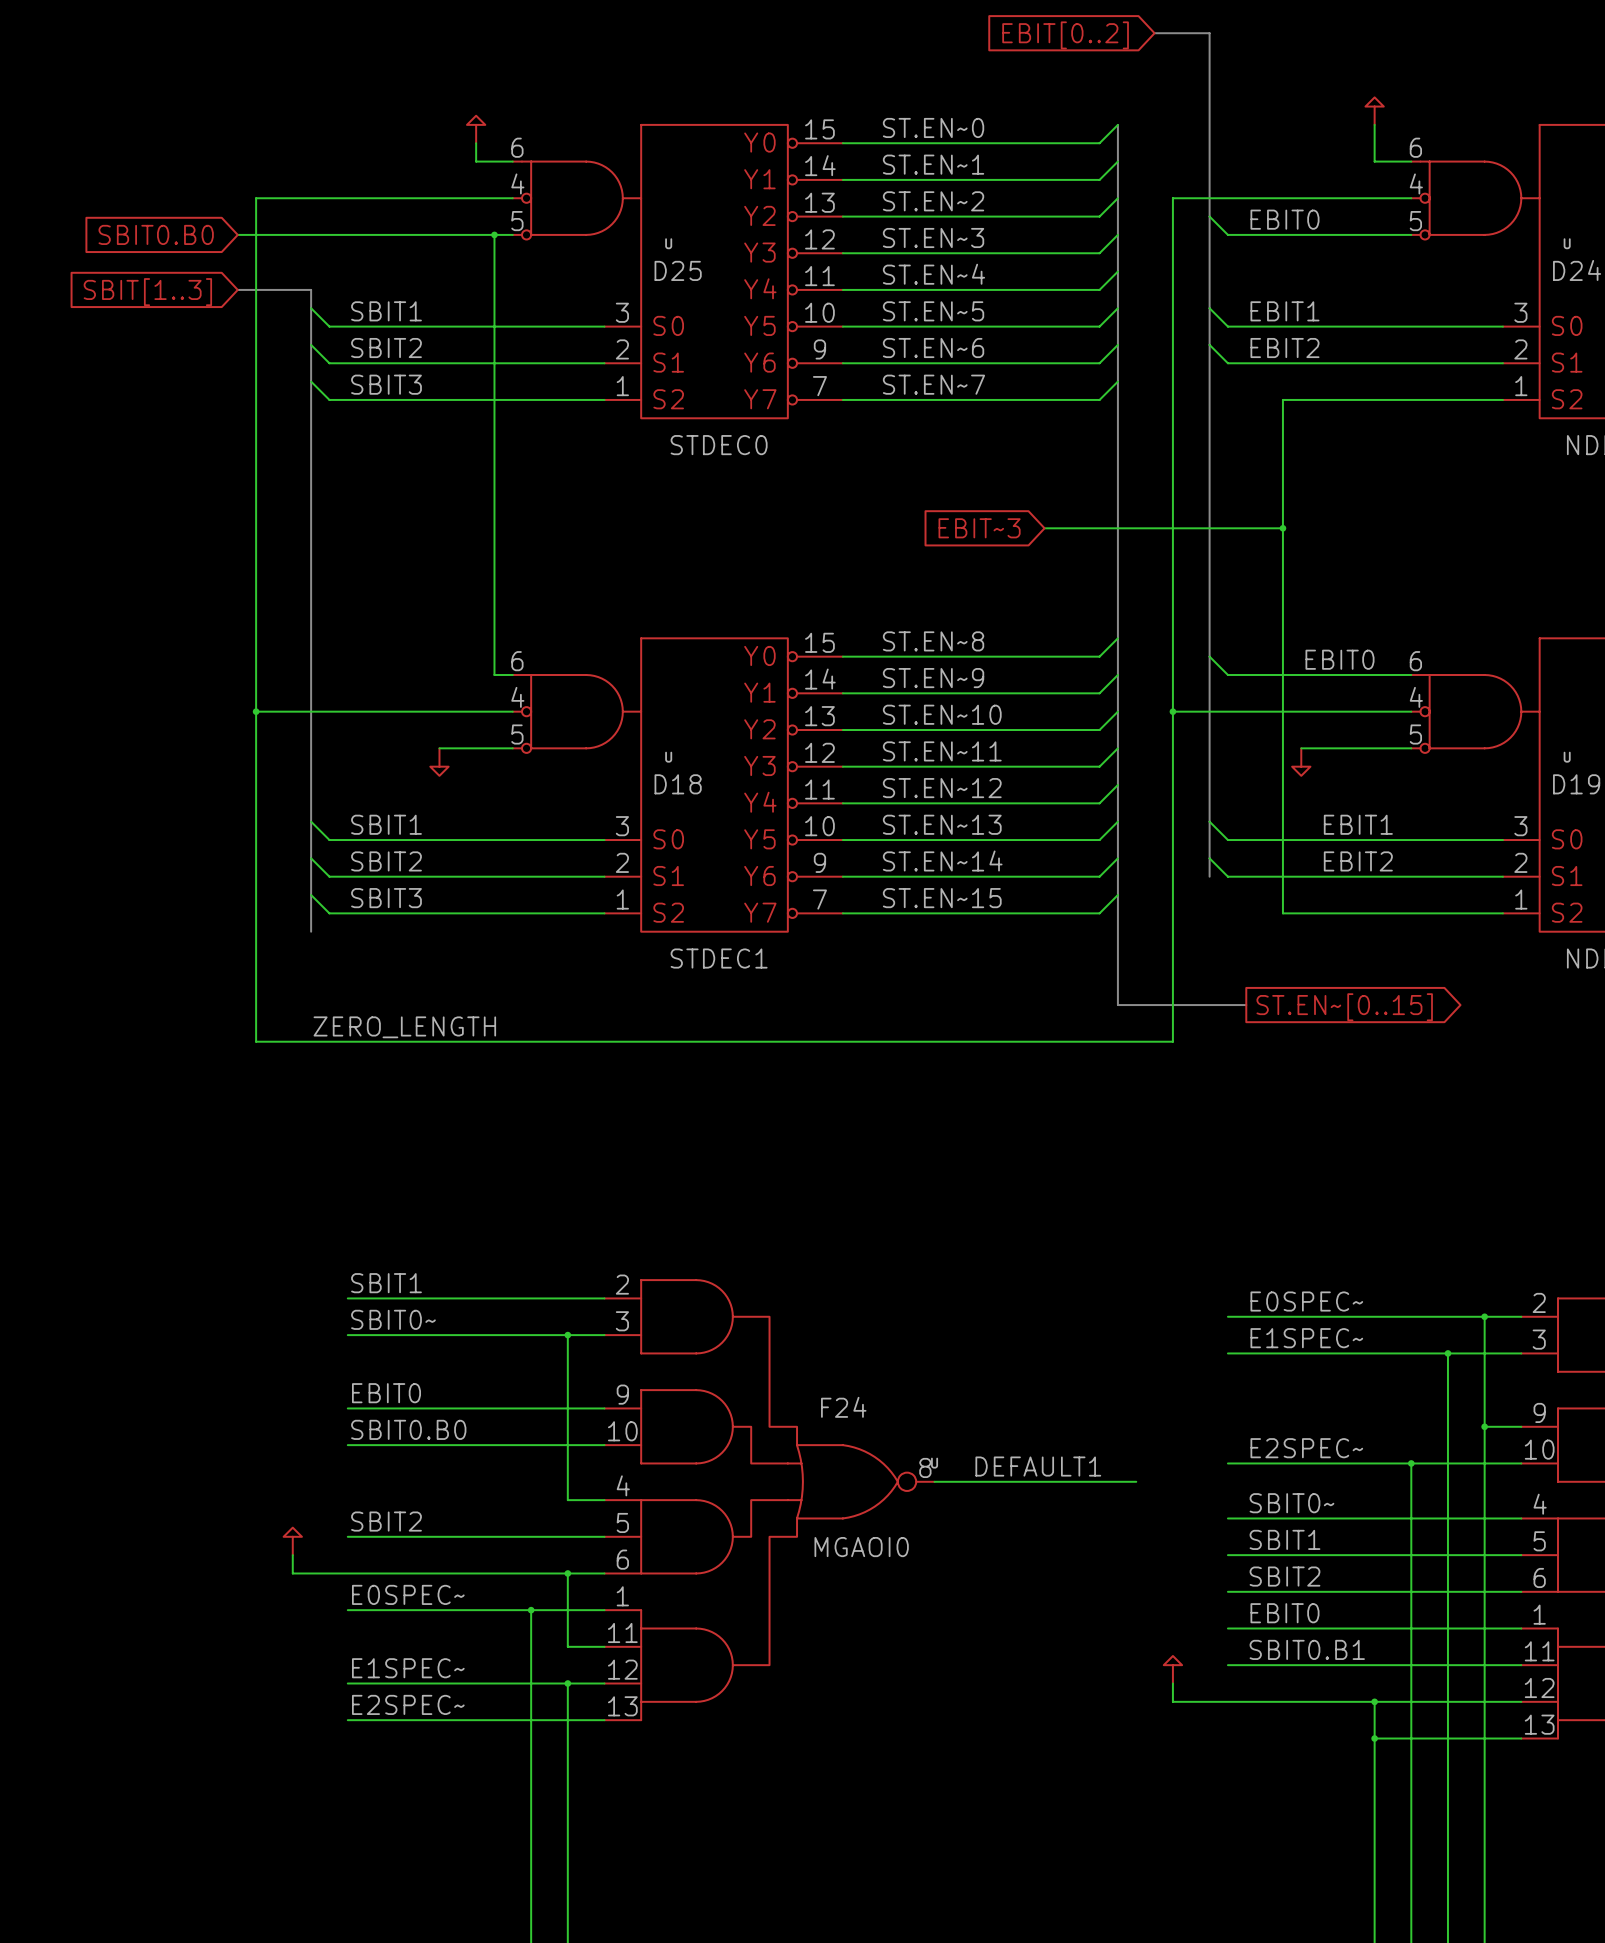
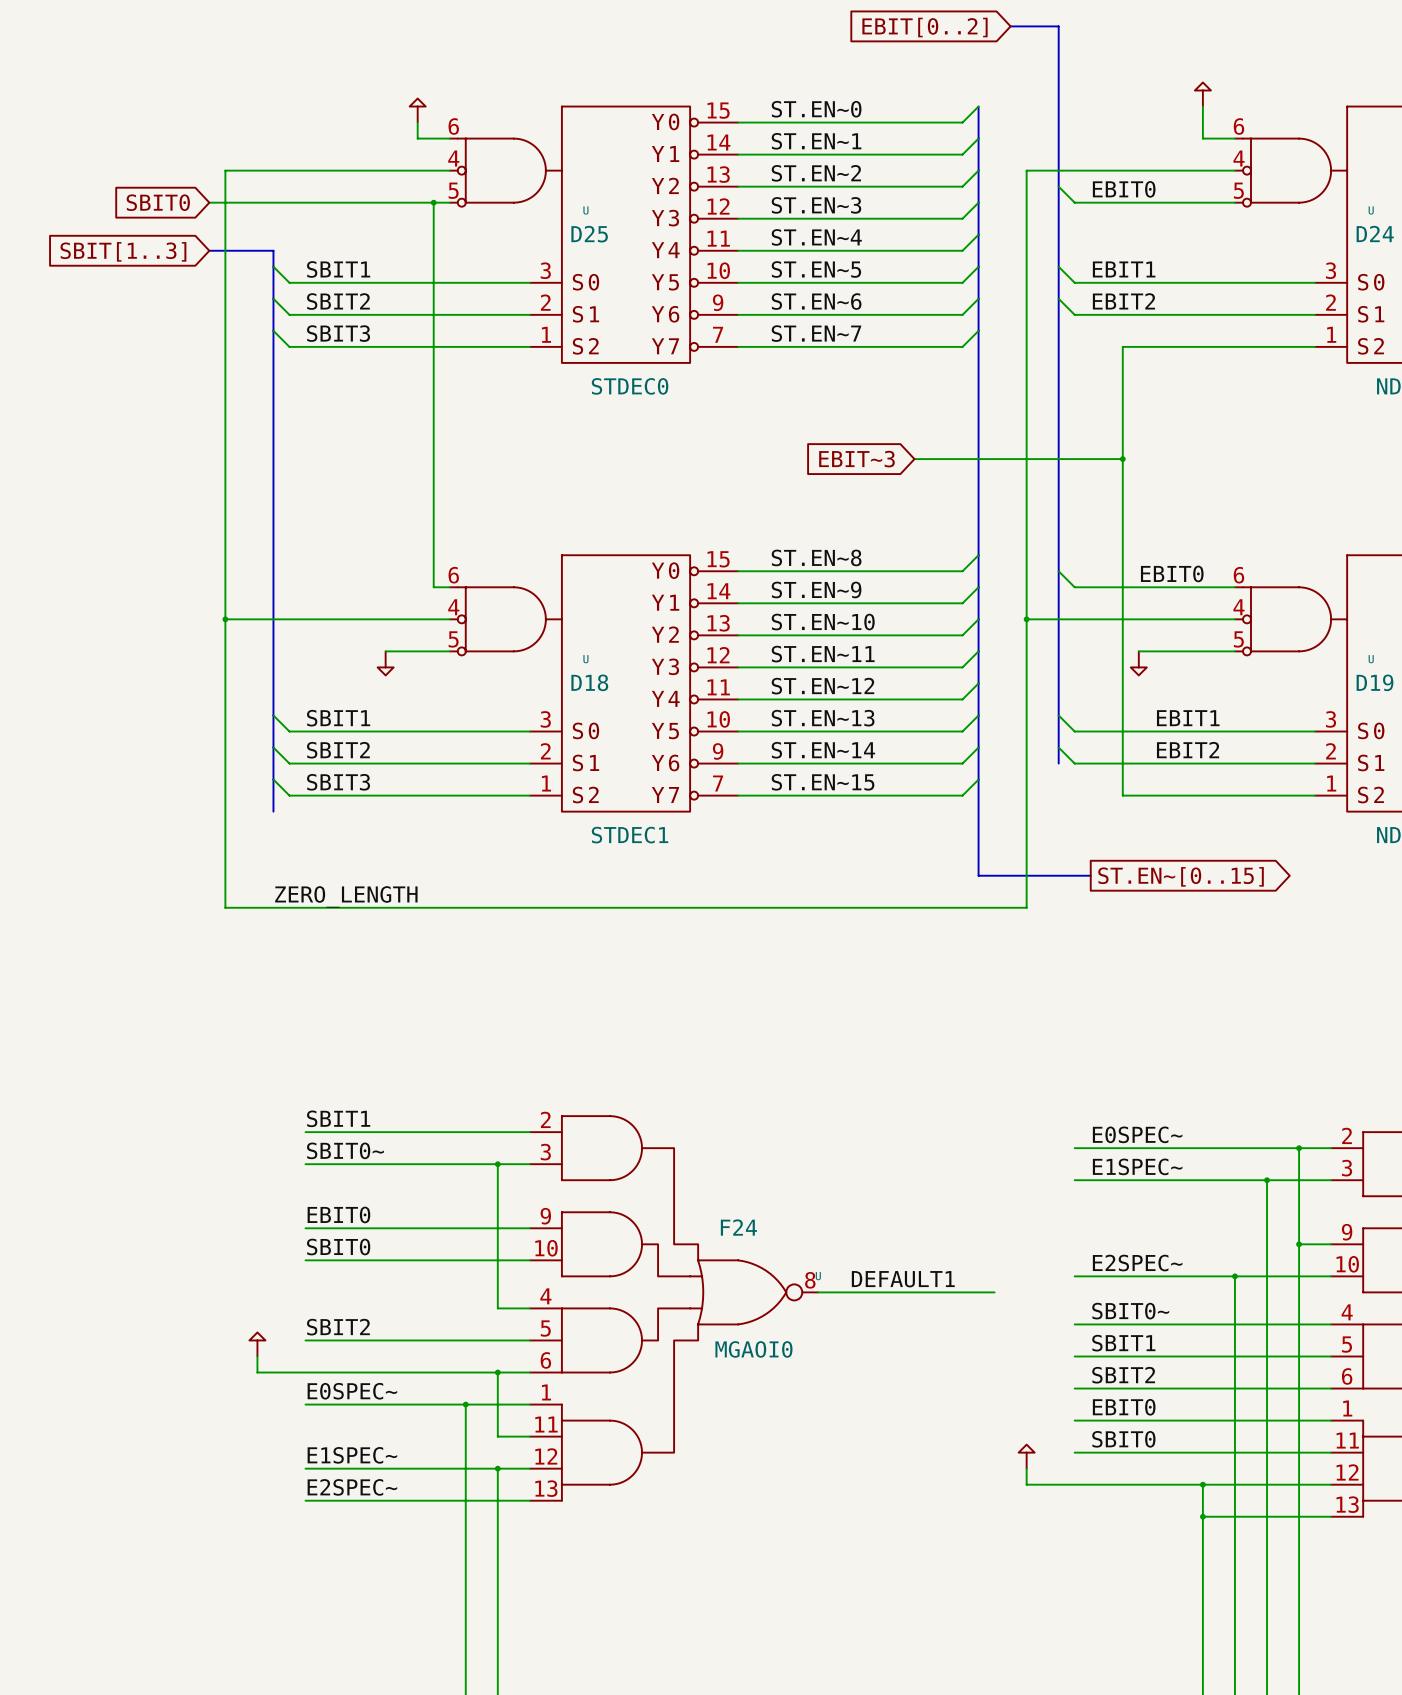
global label: SBIT0.B0 (156, 234) -> SBIT0 (158, 202)
label: SBIT0.B0 (408, 1429) -> SBIT0 (338, 1247)
label: SBIT0.B1 (1307, 1649) -> SBIT0 (1123, 1439)

